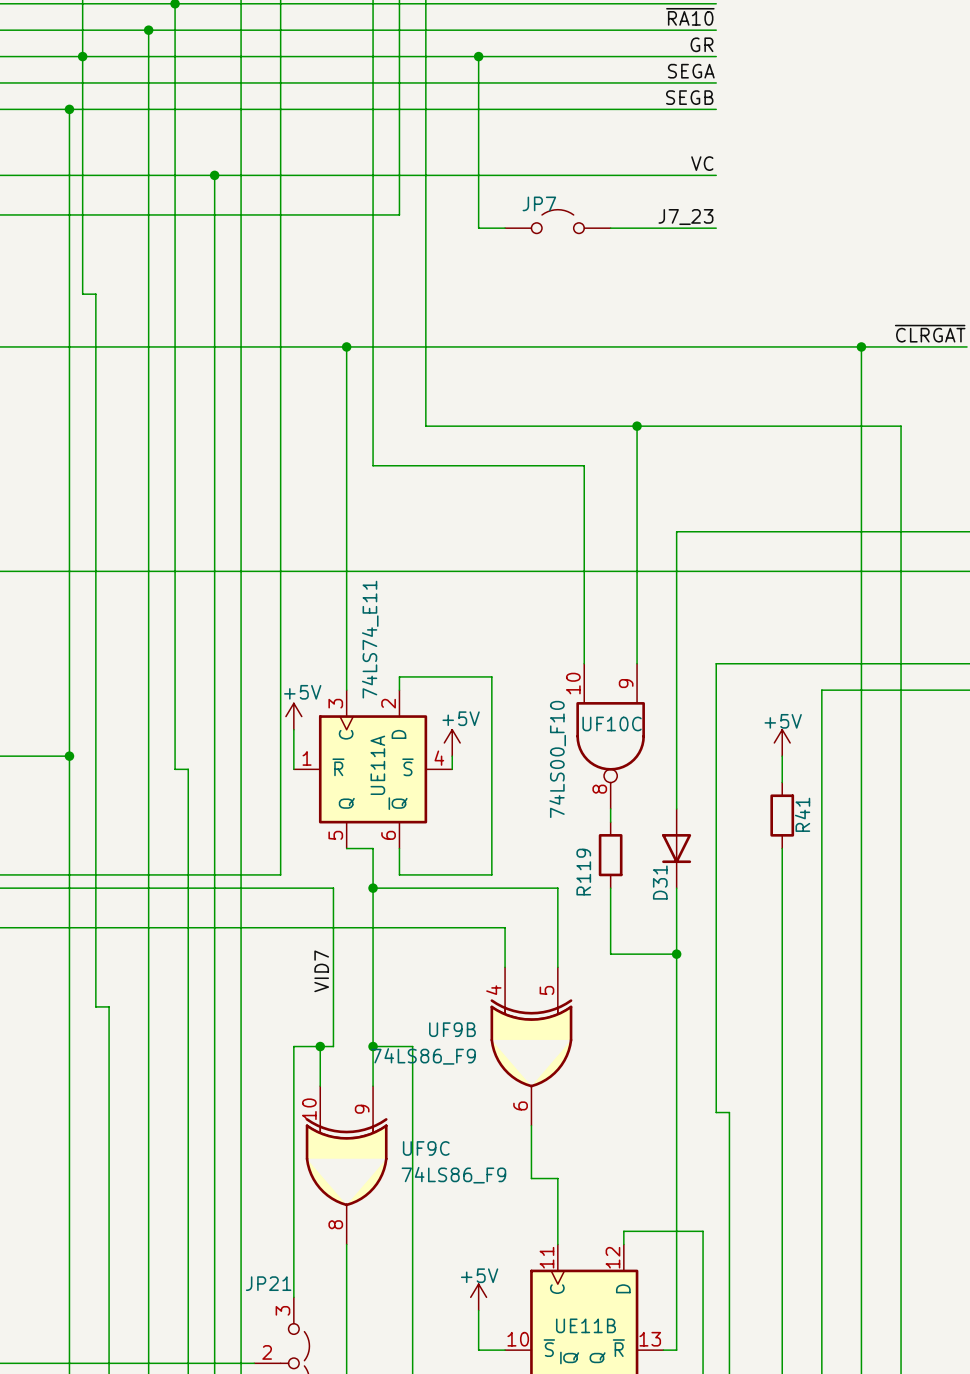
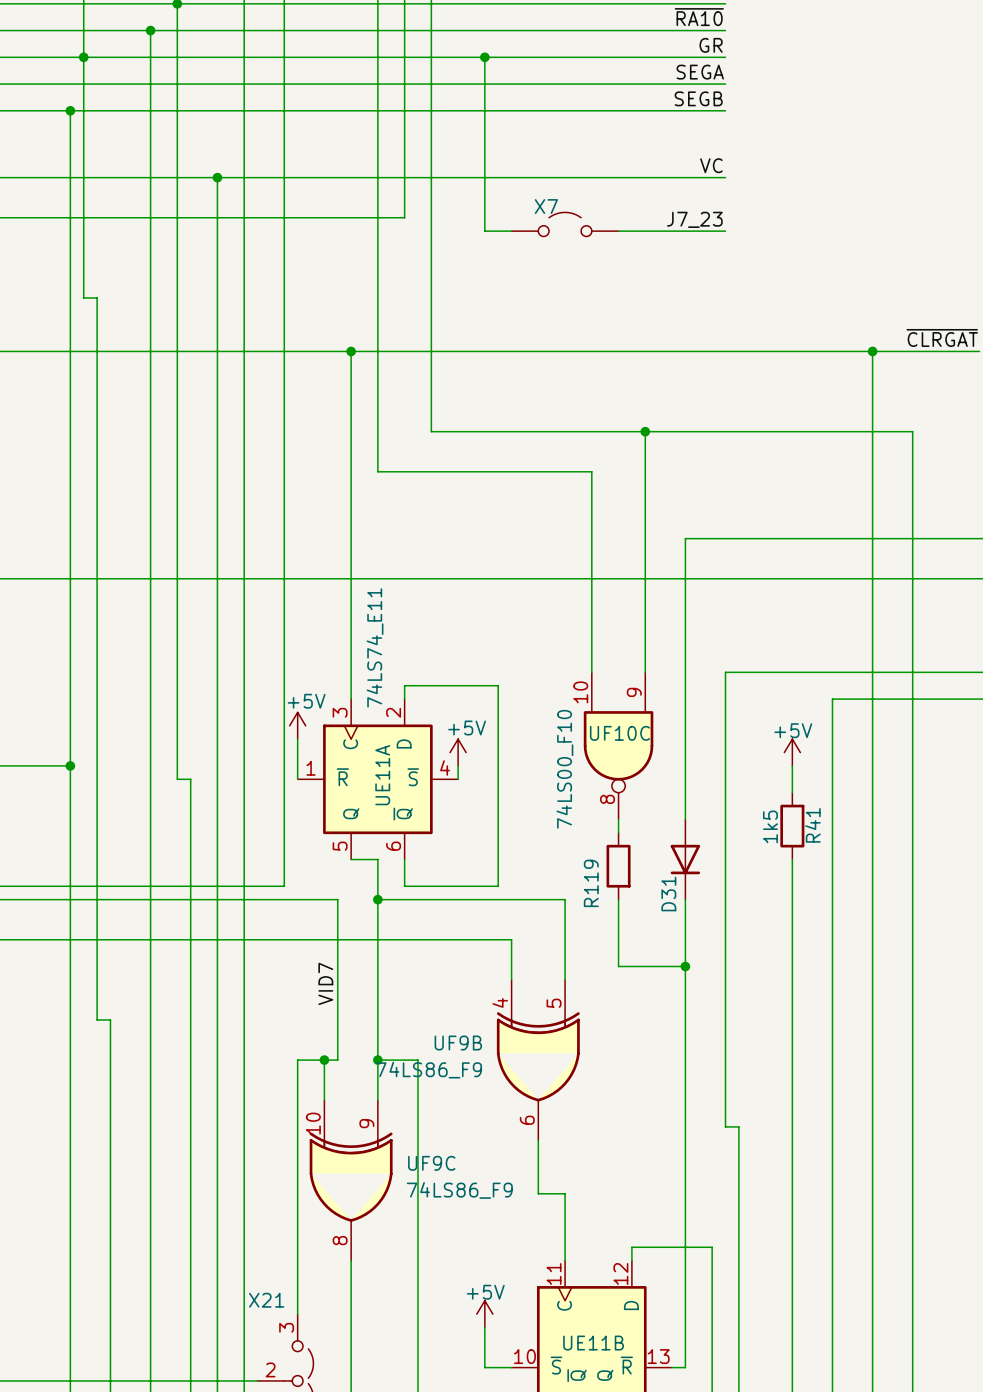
JP7 name: JP7 (539, 203) -> X7 (546, 206)
UF10C symbol: [576, 663, 645, 809] -> [583, 672, 654, 820]
R41 value: none -> 1k5 (770, 826)
JP21 name: JP21 (268, 1283) -> X21 (266, 1300)

